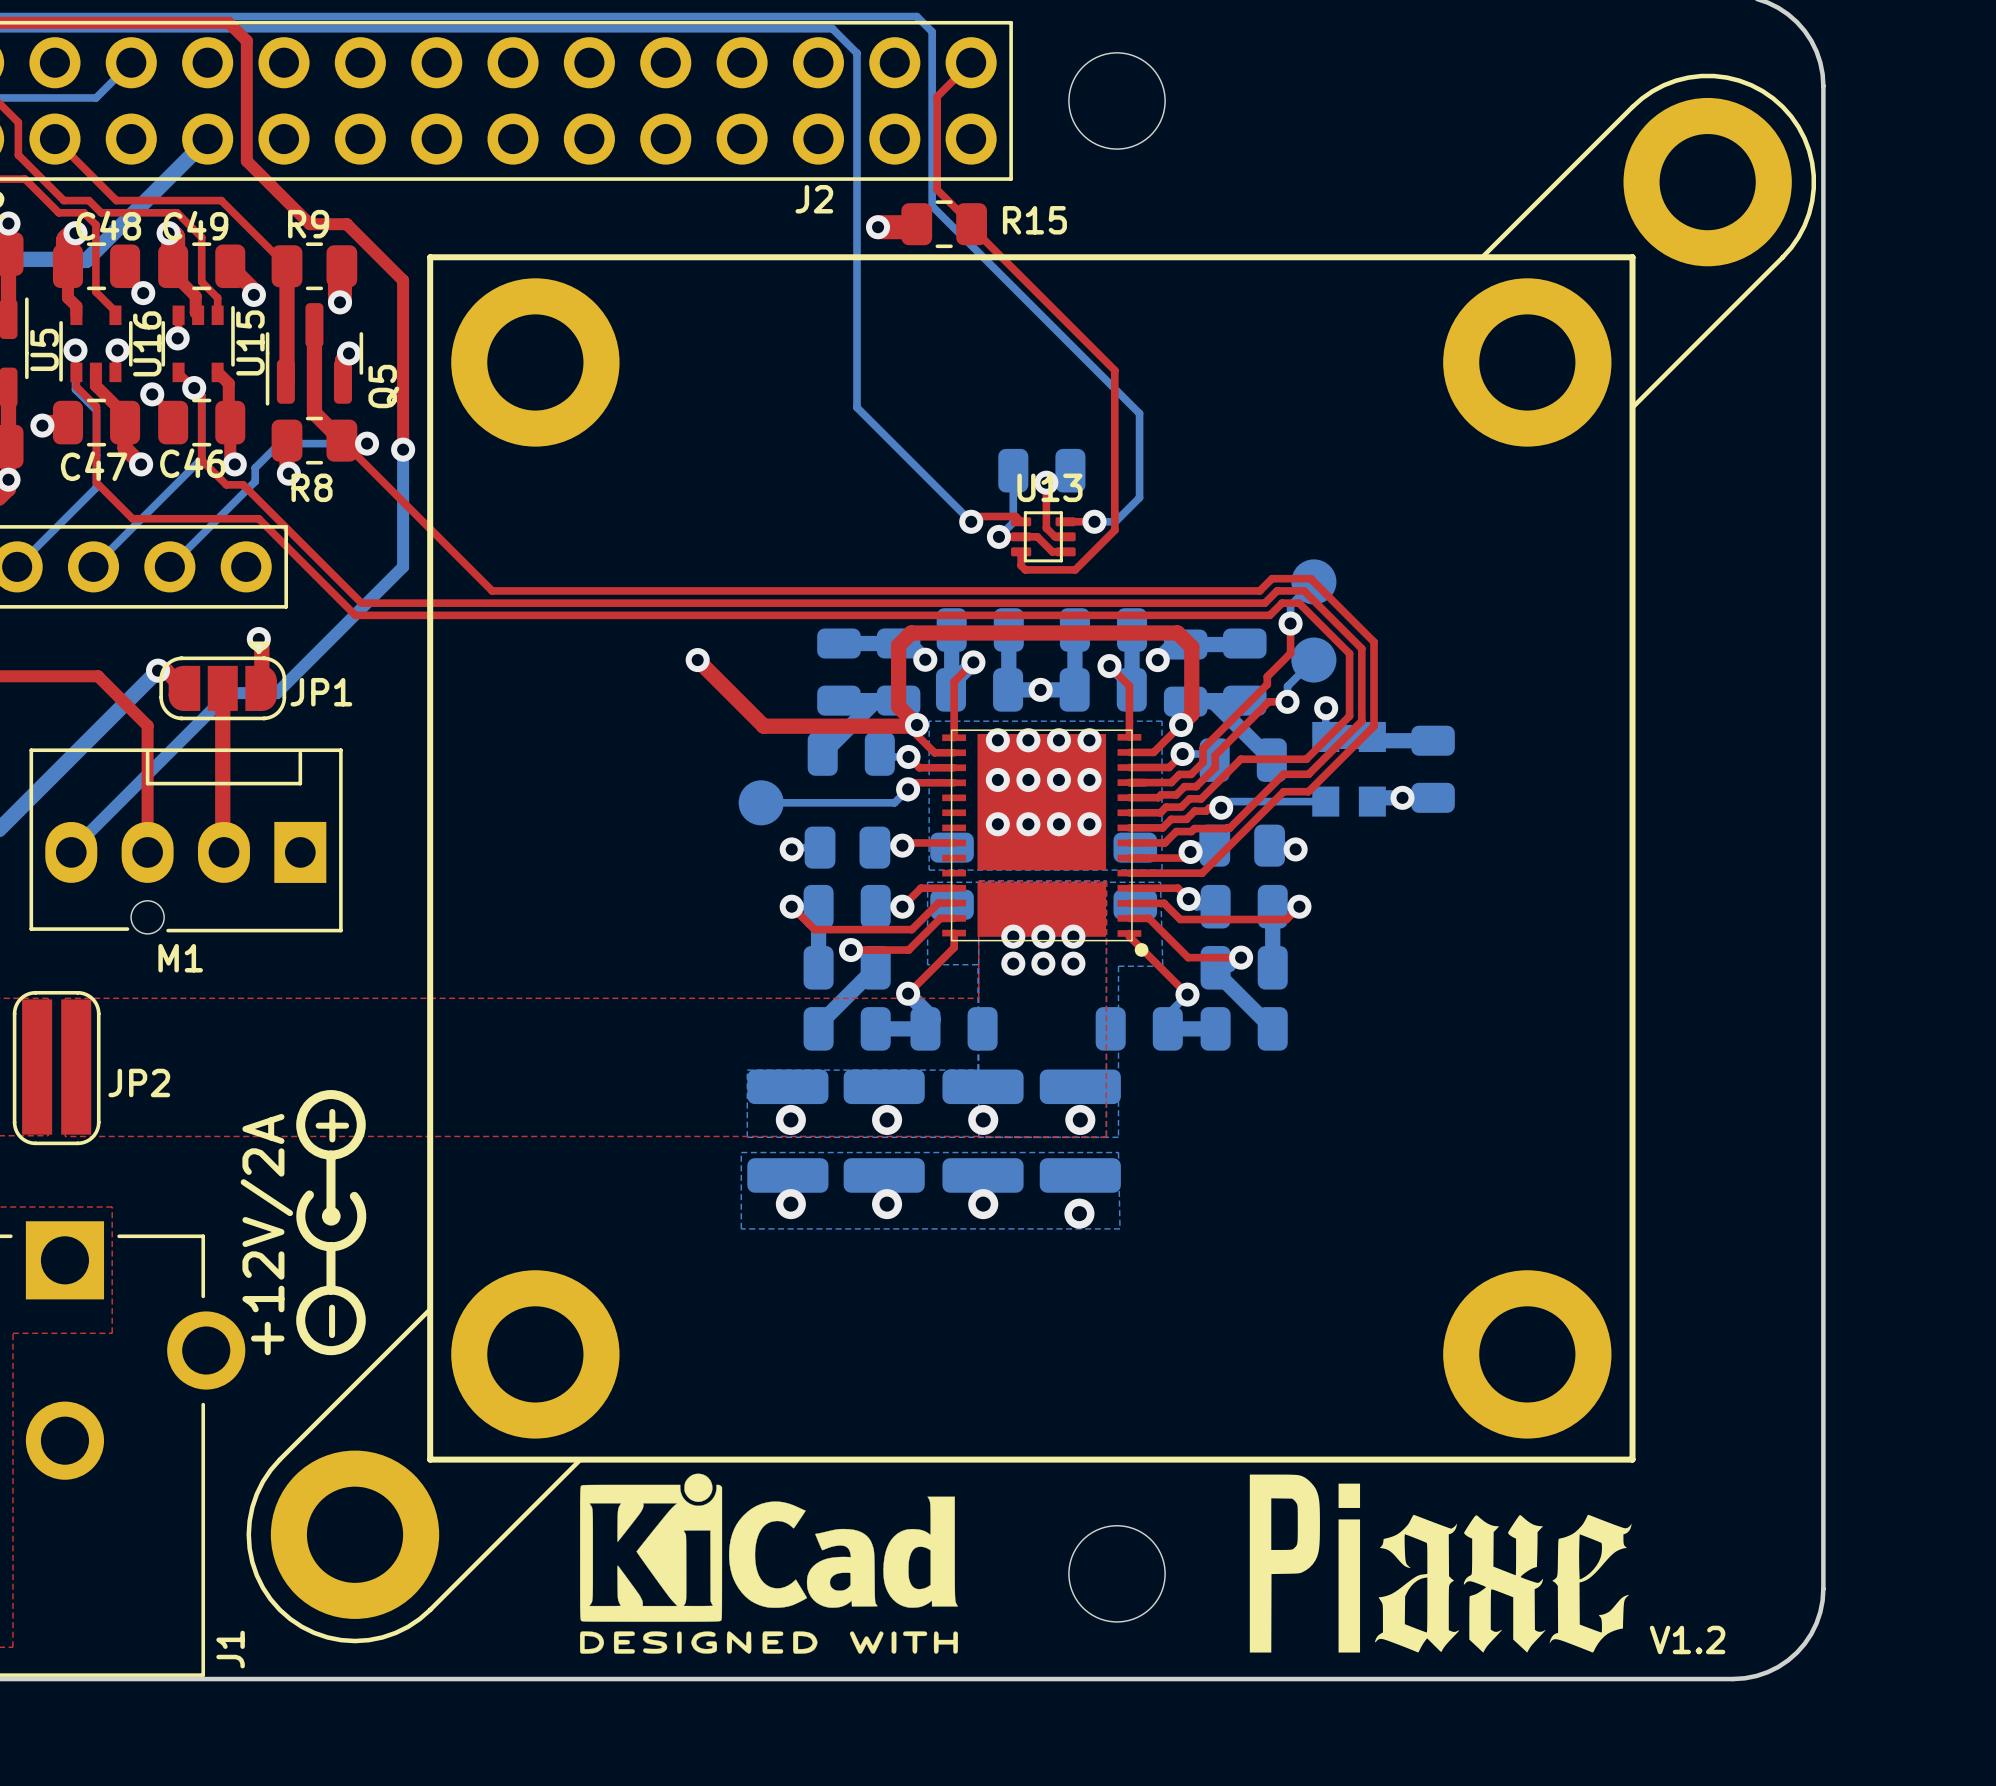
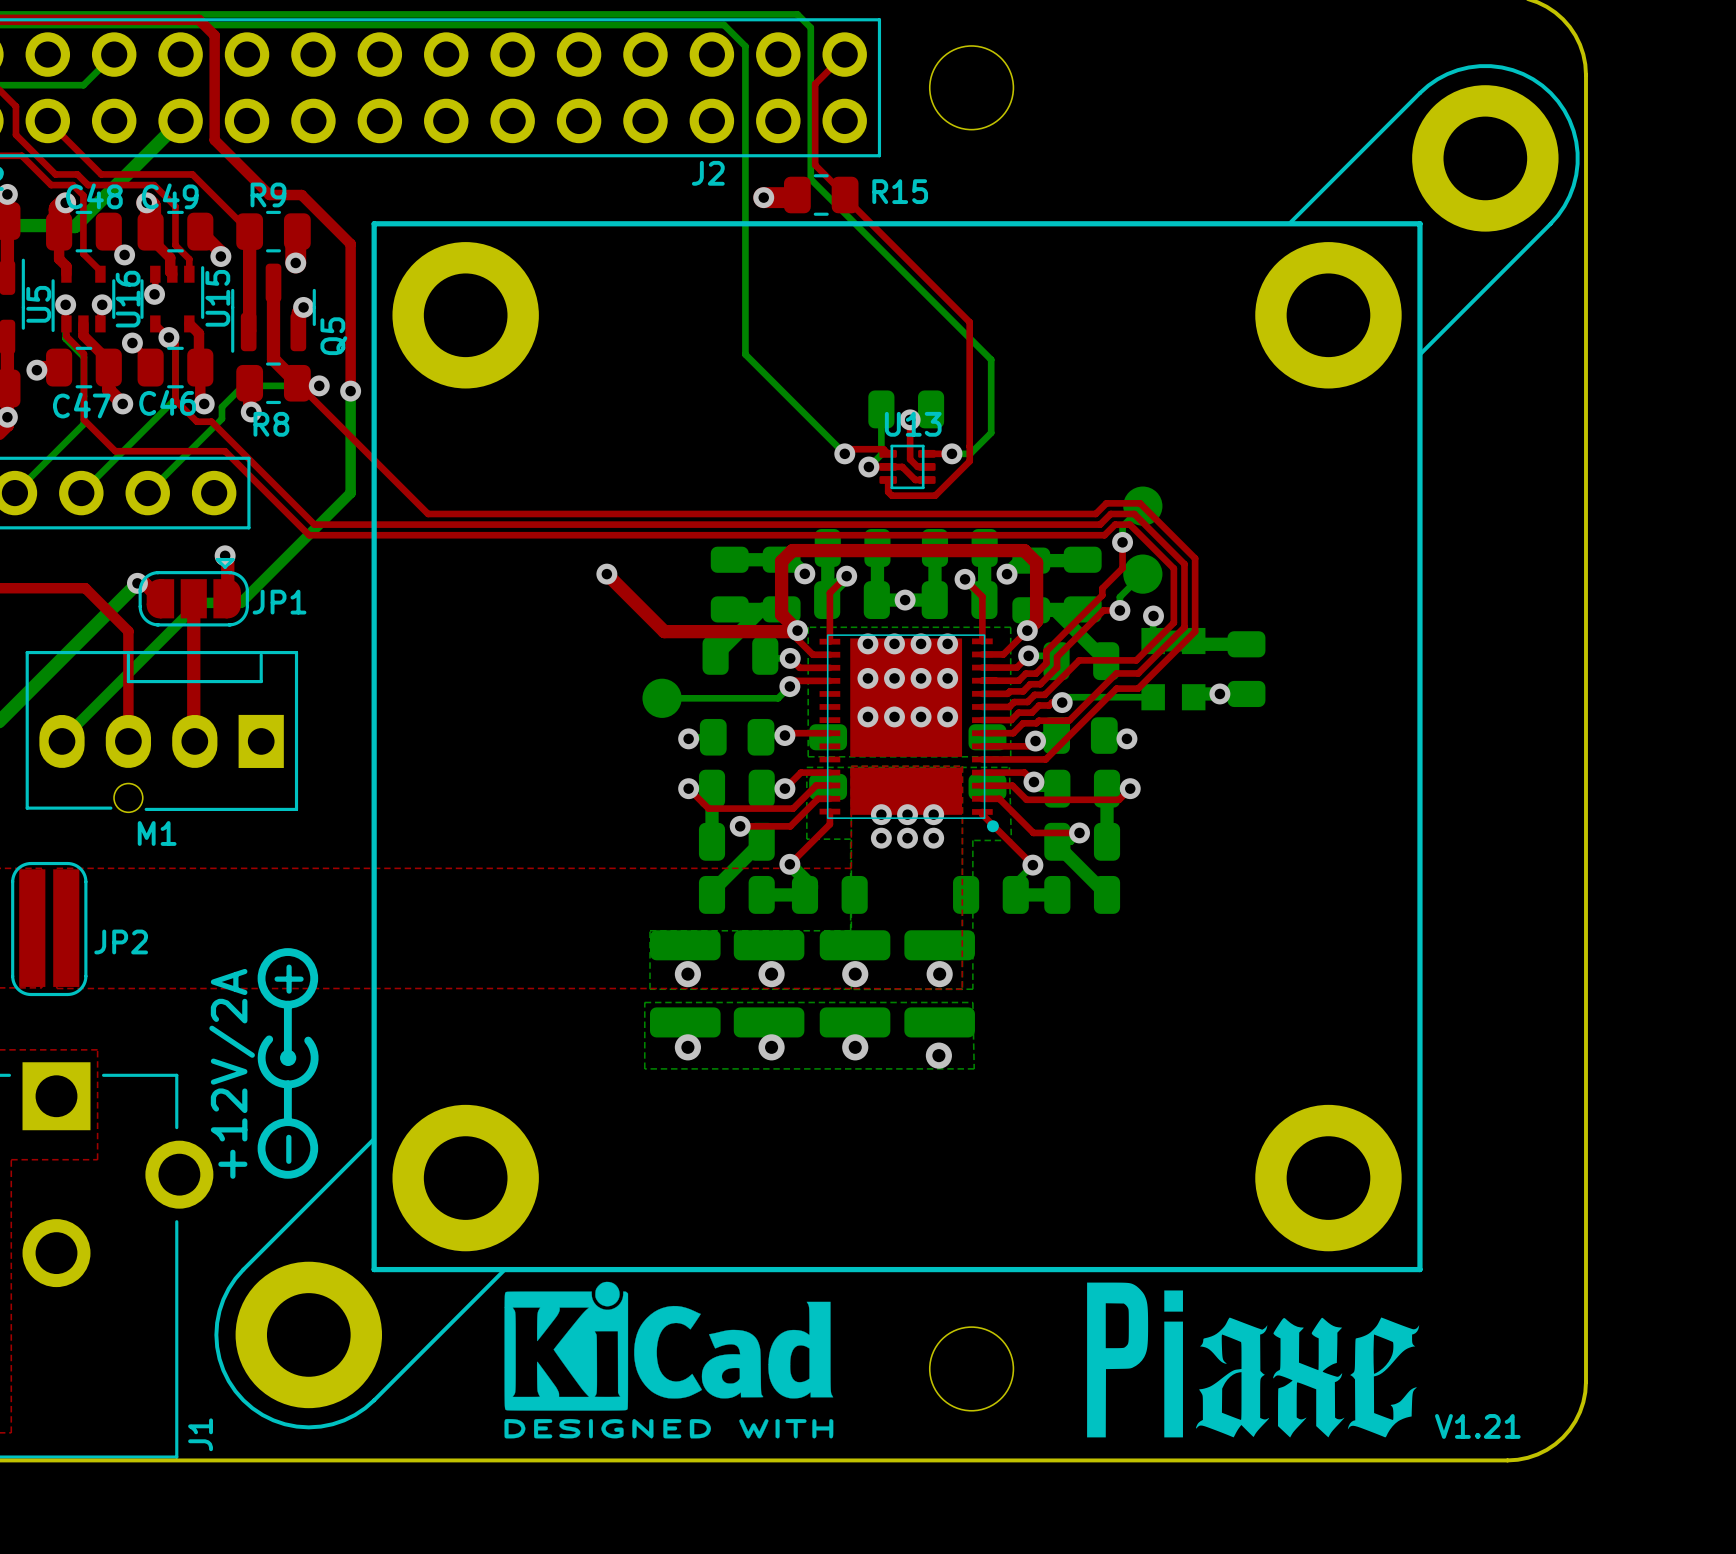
text: V1.2 (1687, 1639) -> V1.21 (1477, 1426)

